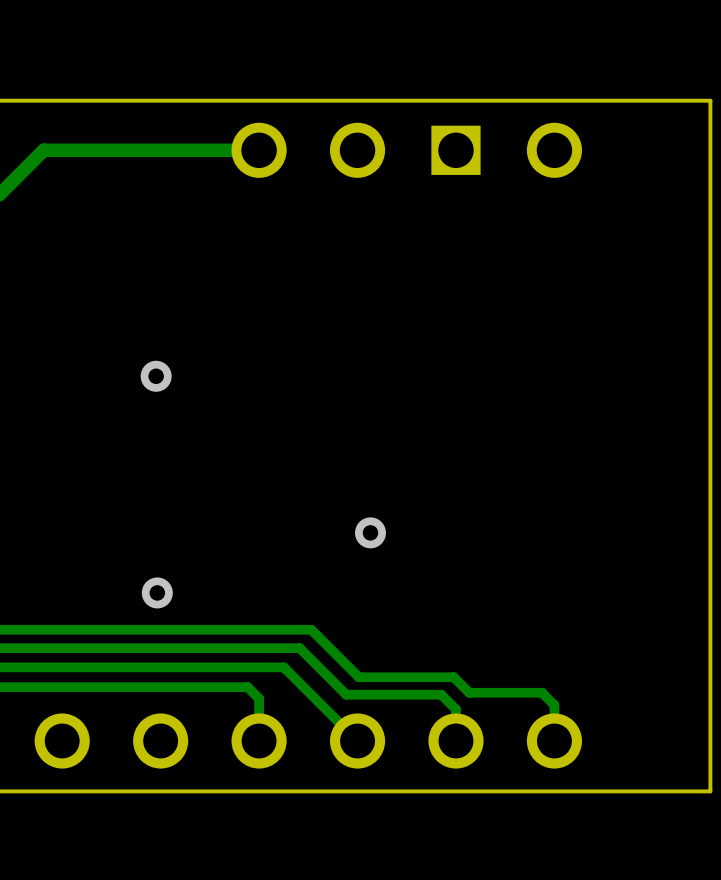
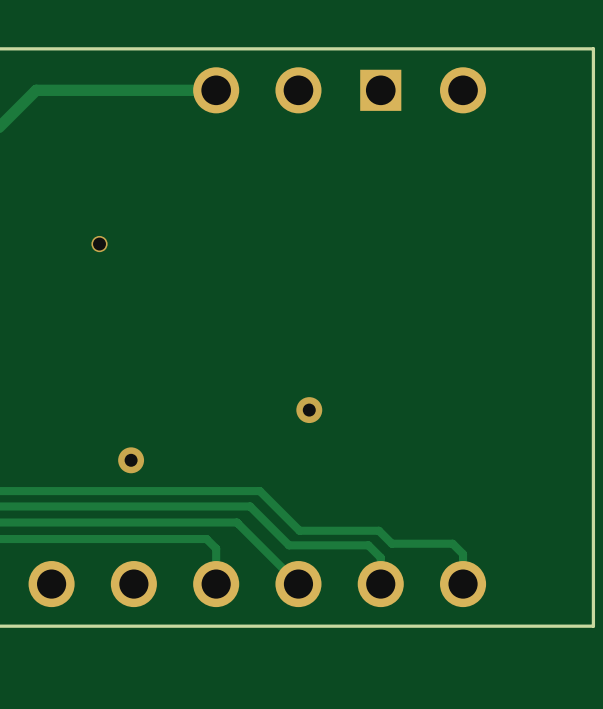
via: none -> (99, 244)
via: (156, 376) -> none

